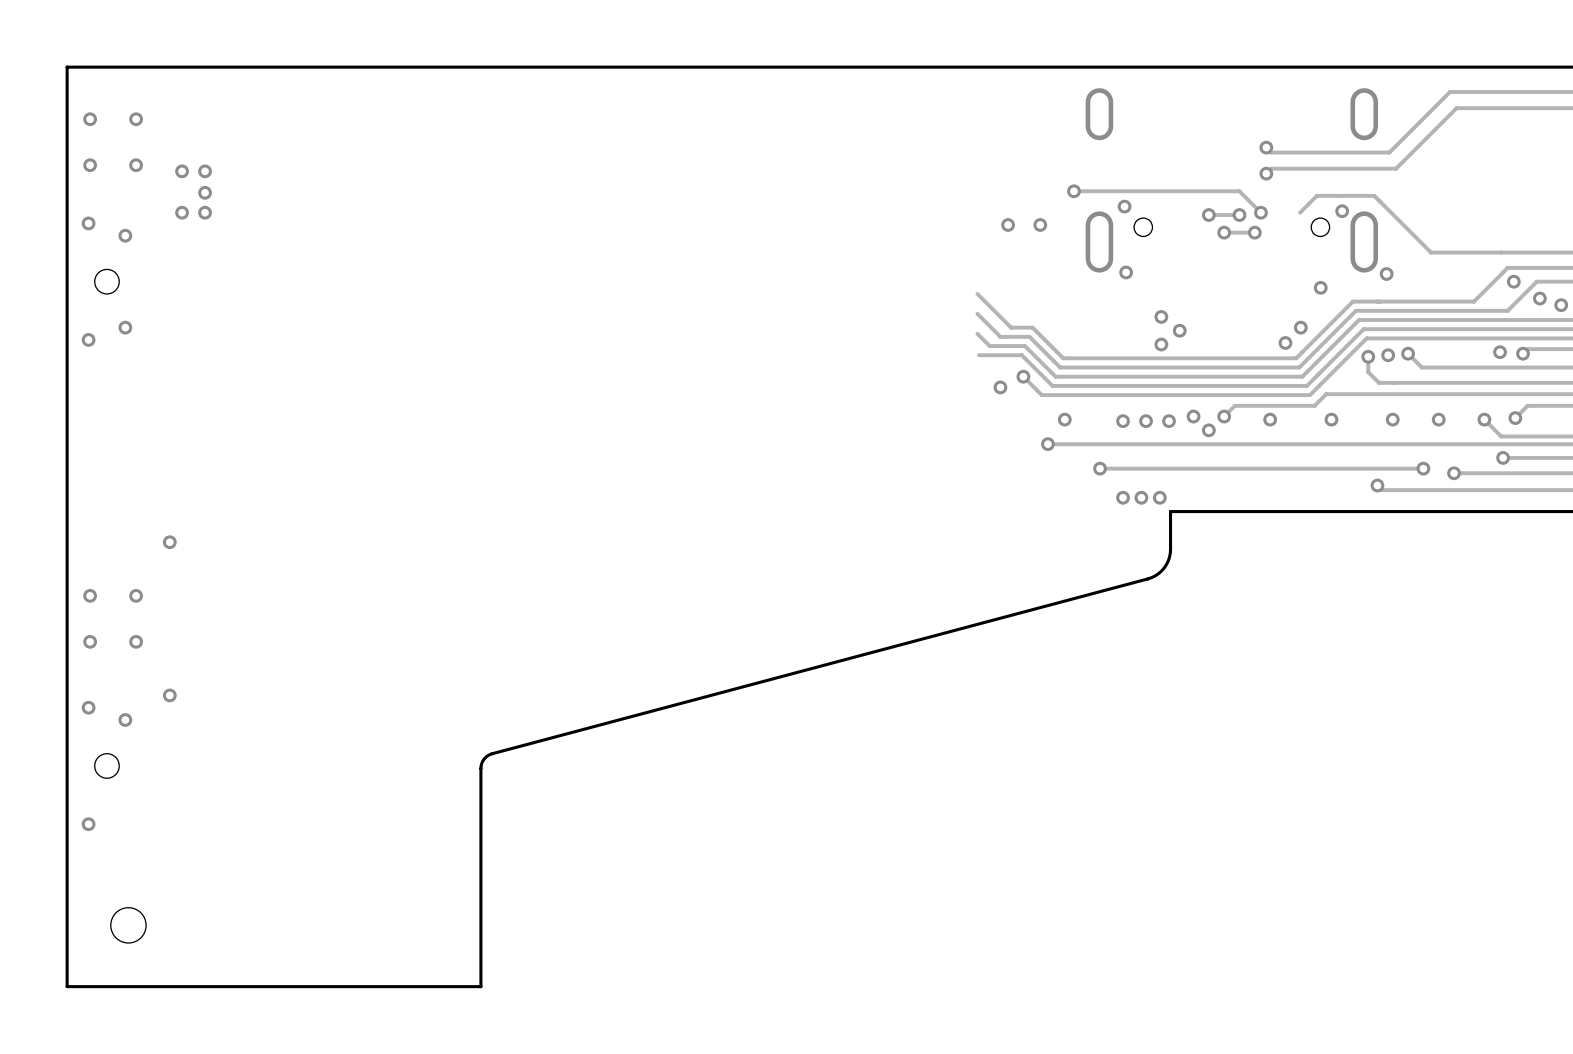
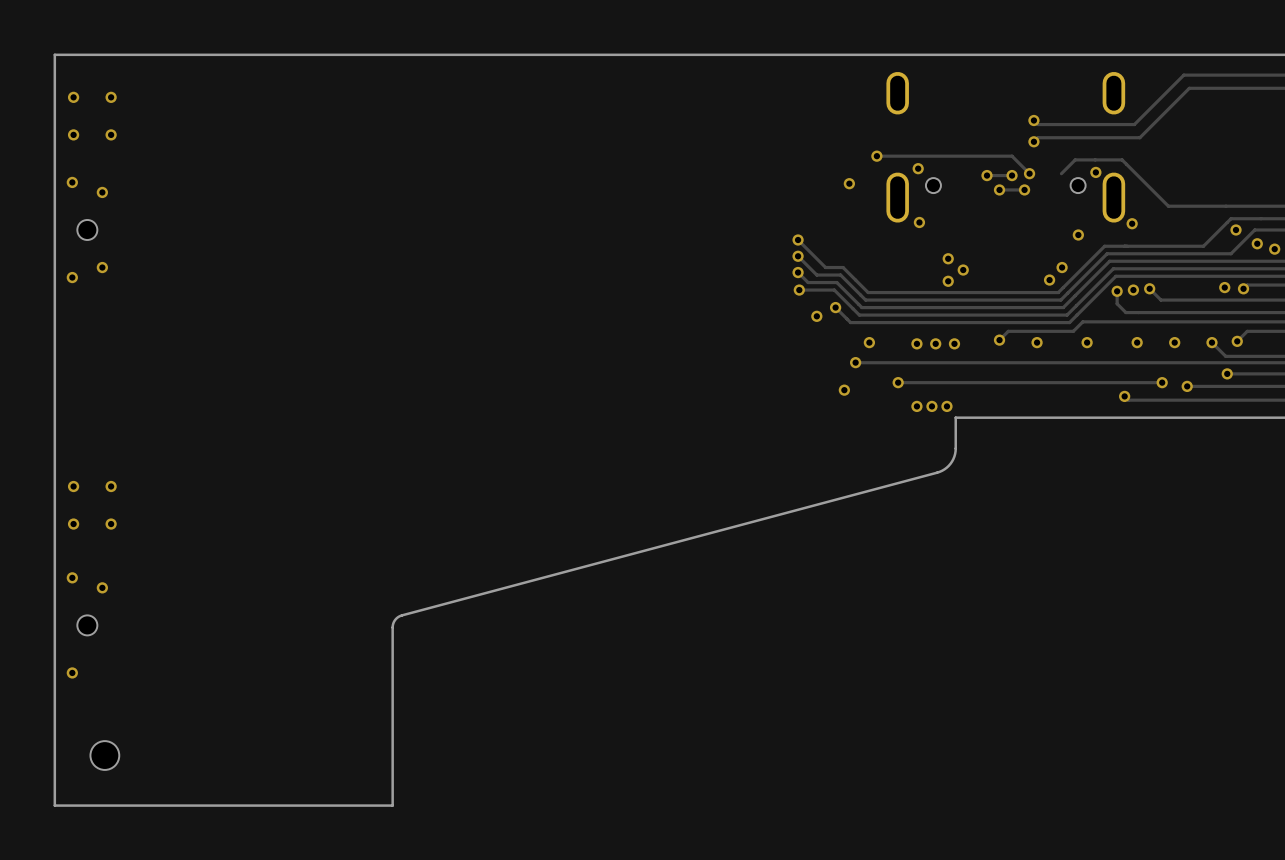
via: (182, 171) -> none
via: (205, 171) -> none
via: (205, 192) -> none
via: (182, 212) -> none
via: (205, 212) -> none
via: (1008, 224) -> none
via: none -> (798, 240)
via: none -> (798, 256)
via: none -> (798, 272)
via: none -> (799, 290)
via: (1193, 416) -> none
via: (1208, 430) -> none
via: none -> (844, 390)
via: (169, 542) -> none
via: (169, 695) -> none

